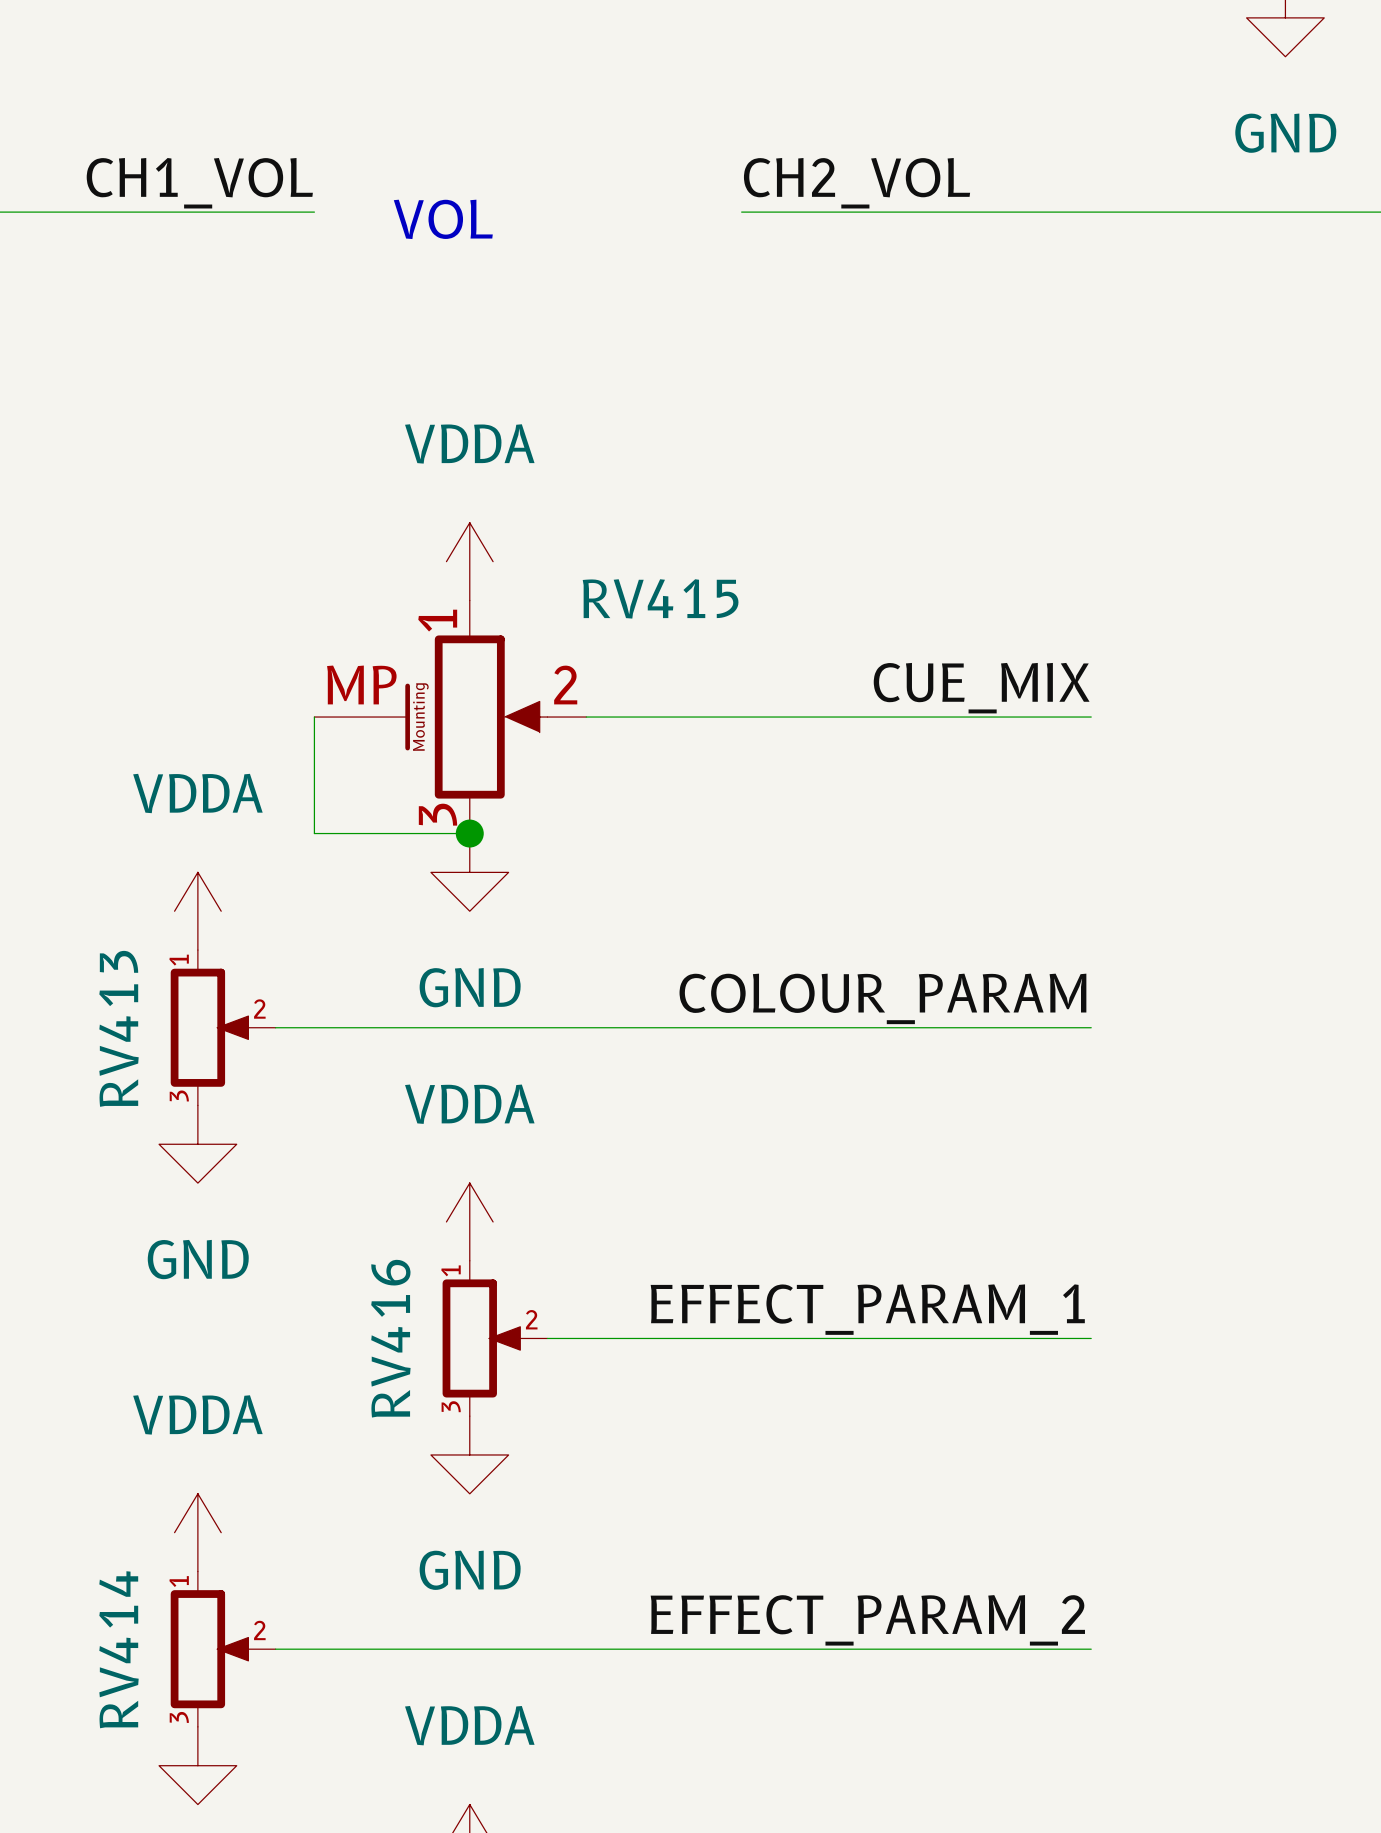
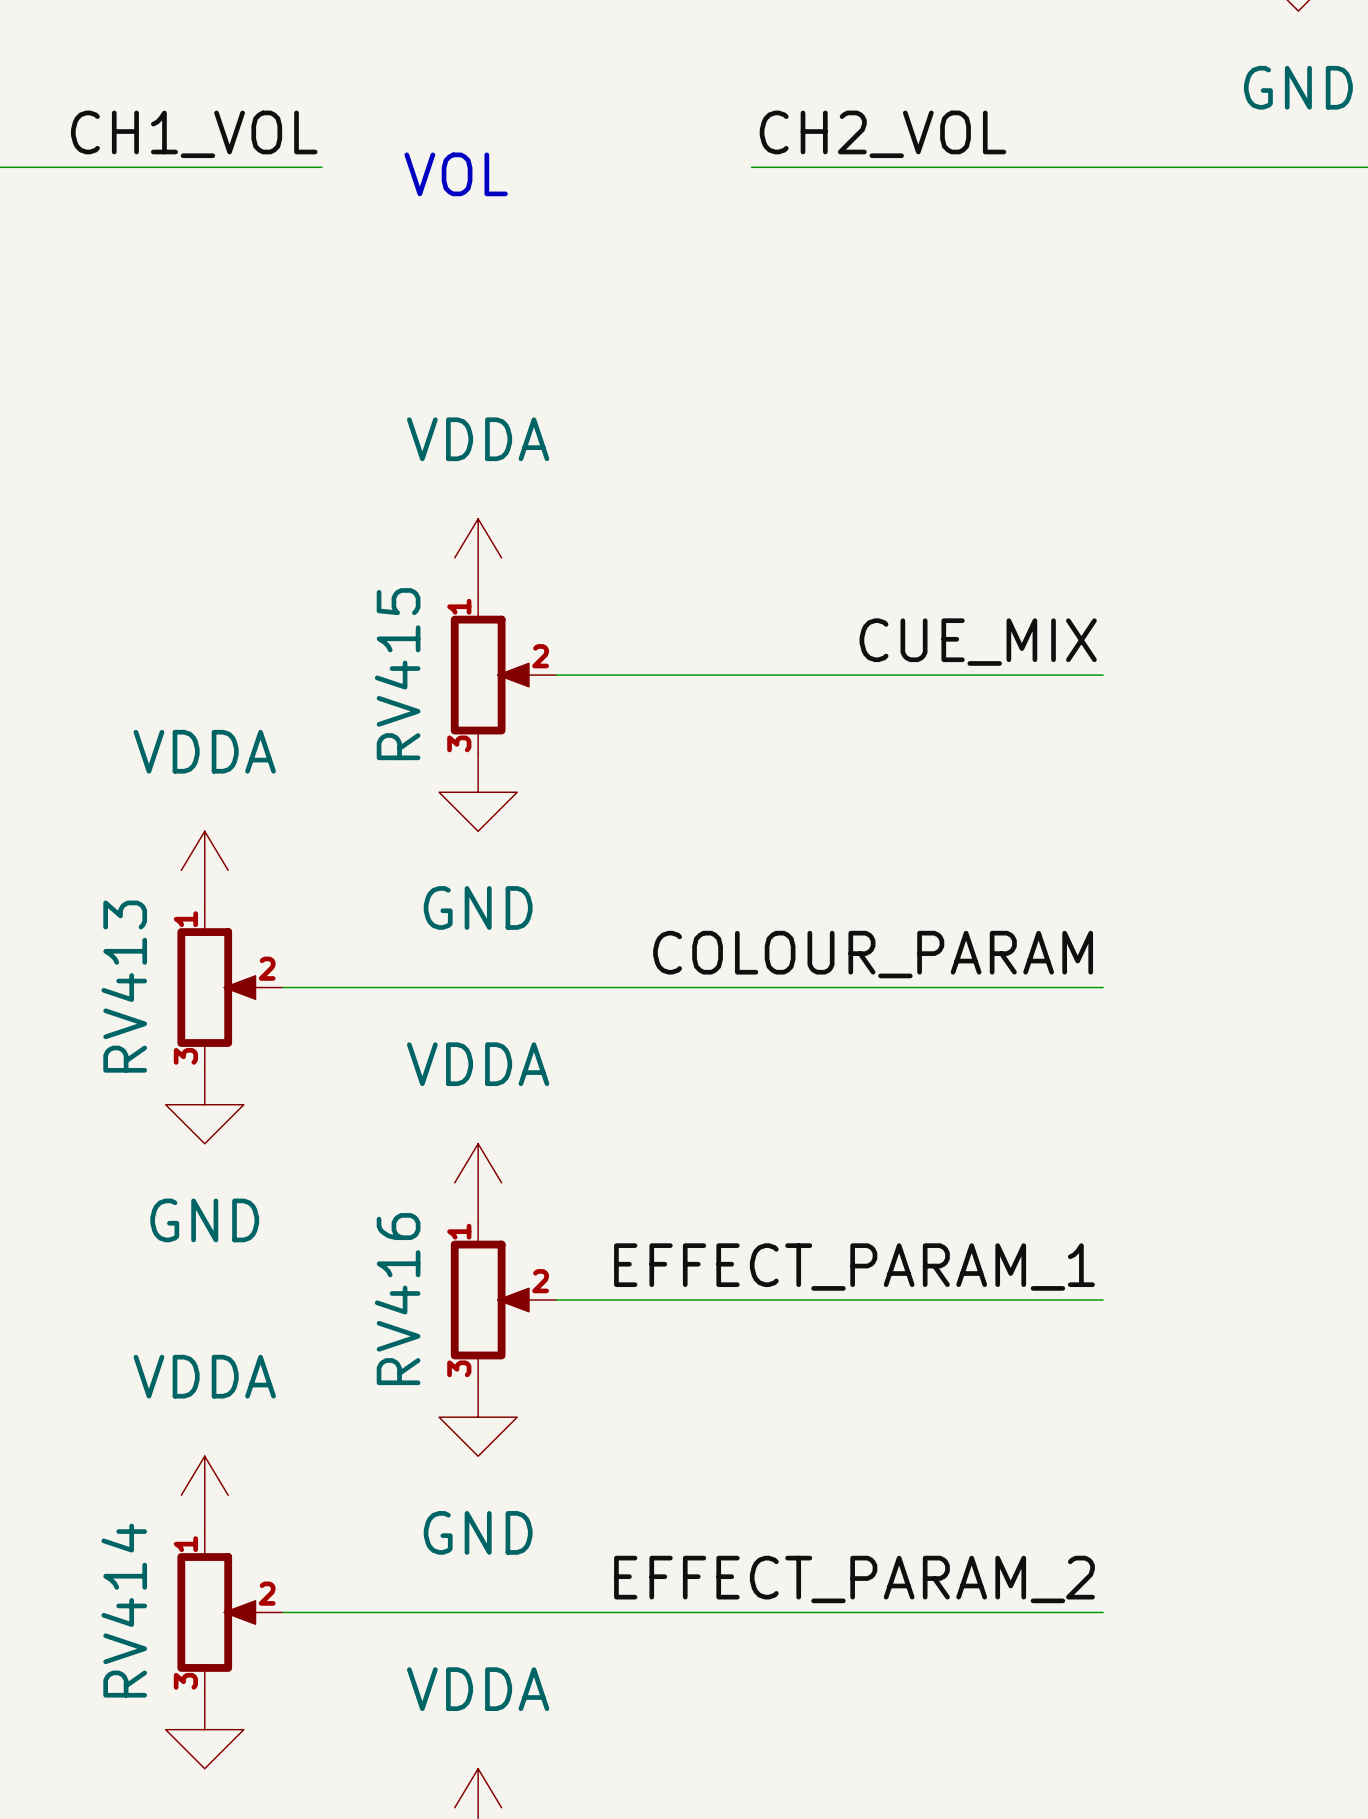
power symbol position: VDDA (469, 561) -> VDDA (478, 557)
RV415 name position: RV415 (660, 598) -> RV415 (397, 674)
RV415 symbol: [314, 600, 587, 834] -> [450, 596, 557, 754]
wire: (314, 717) (314, 833) (469, 833) -> none
junction: (469, 833) -> none
power symbol position: GND (469, 872) -> GND (478, 792)

